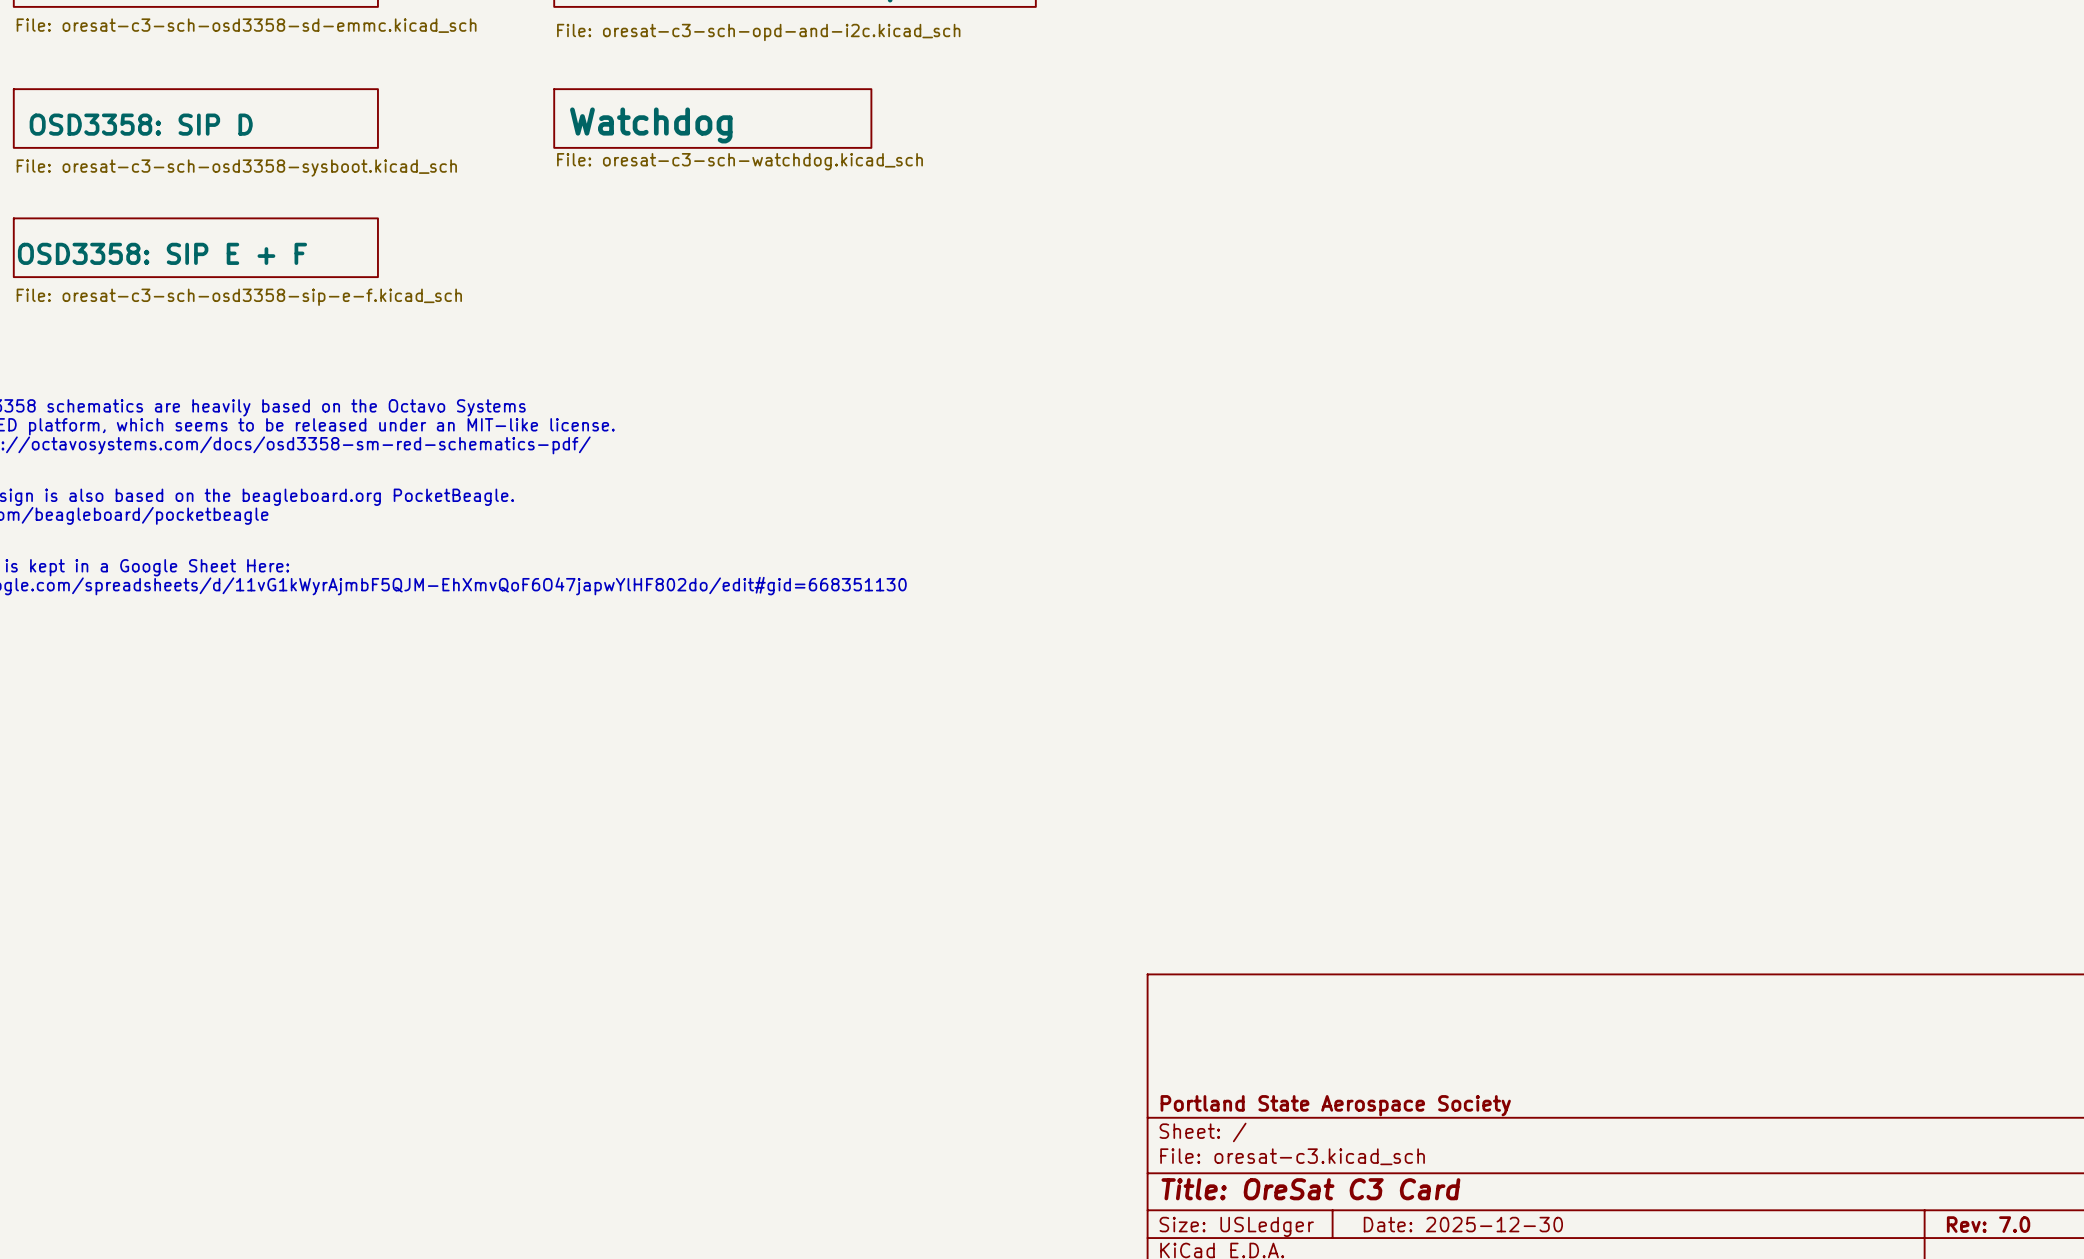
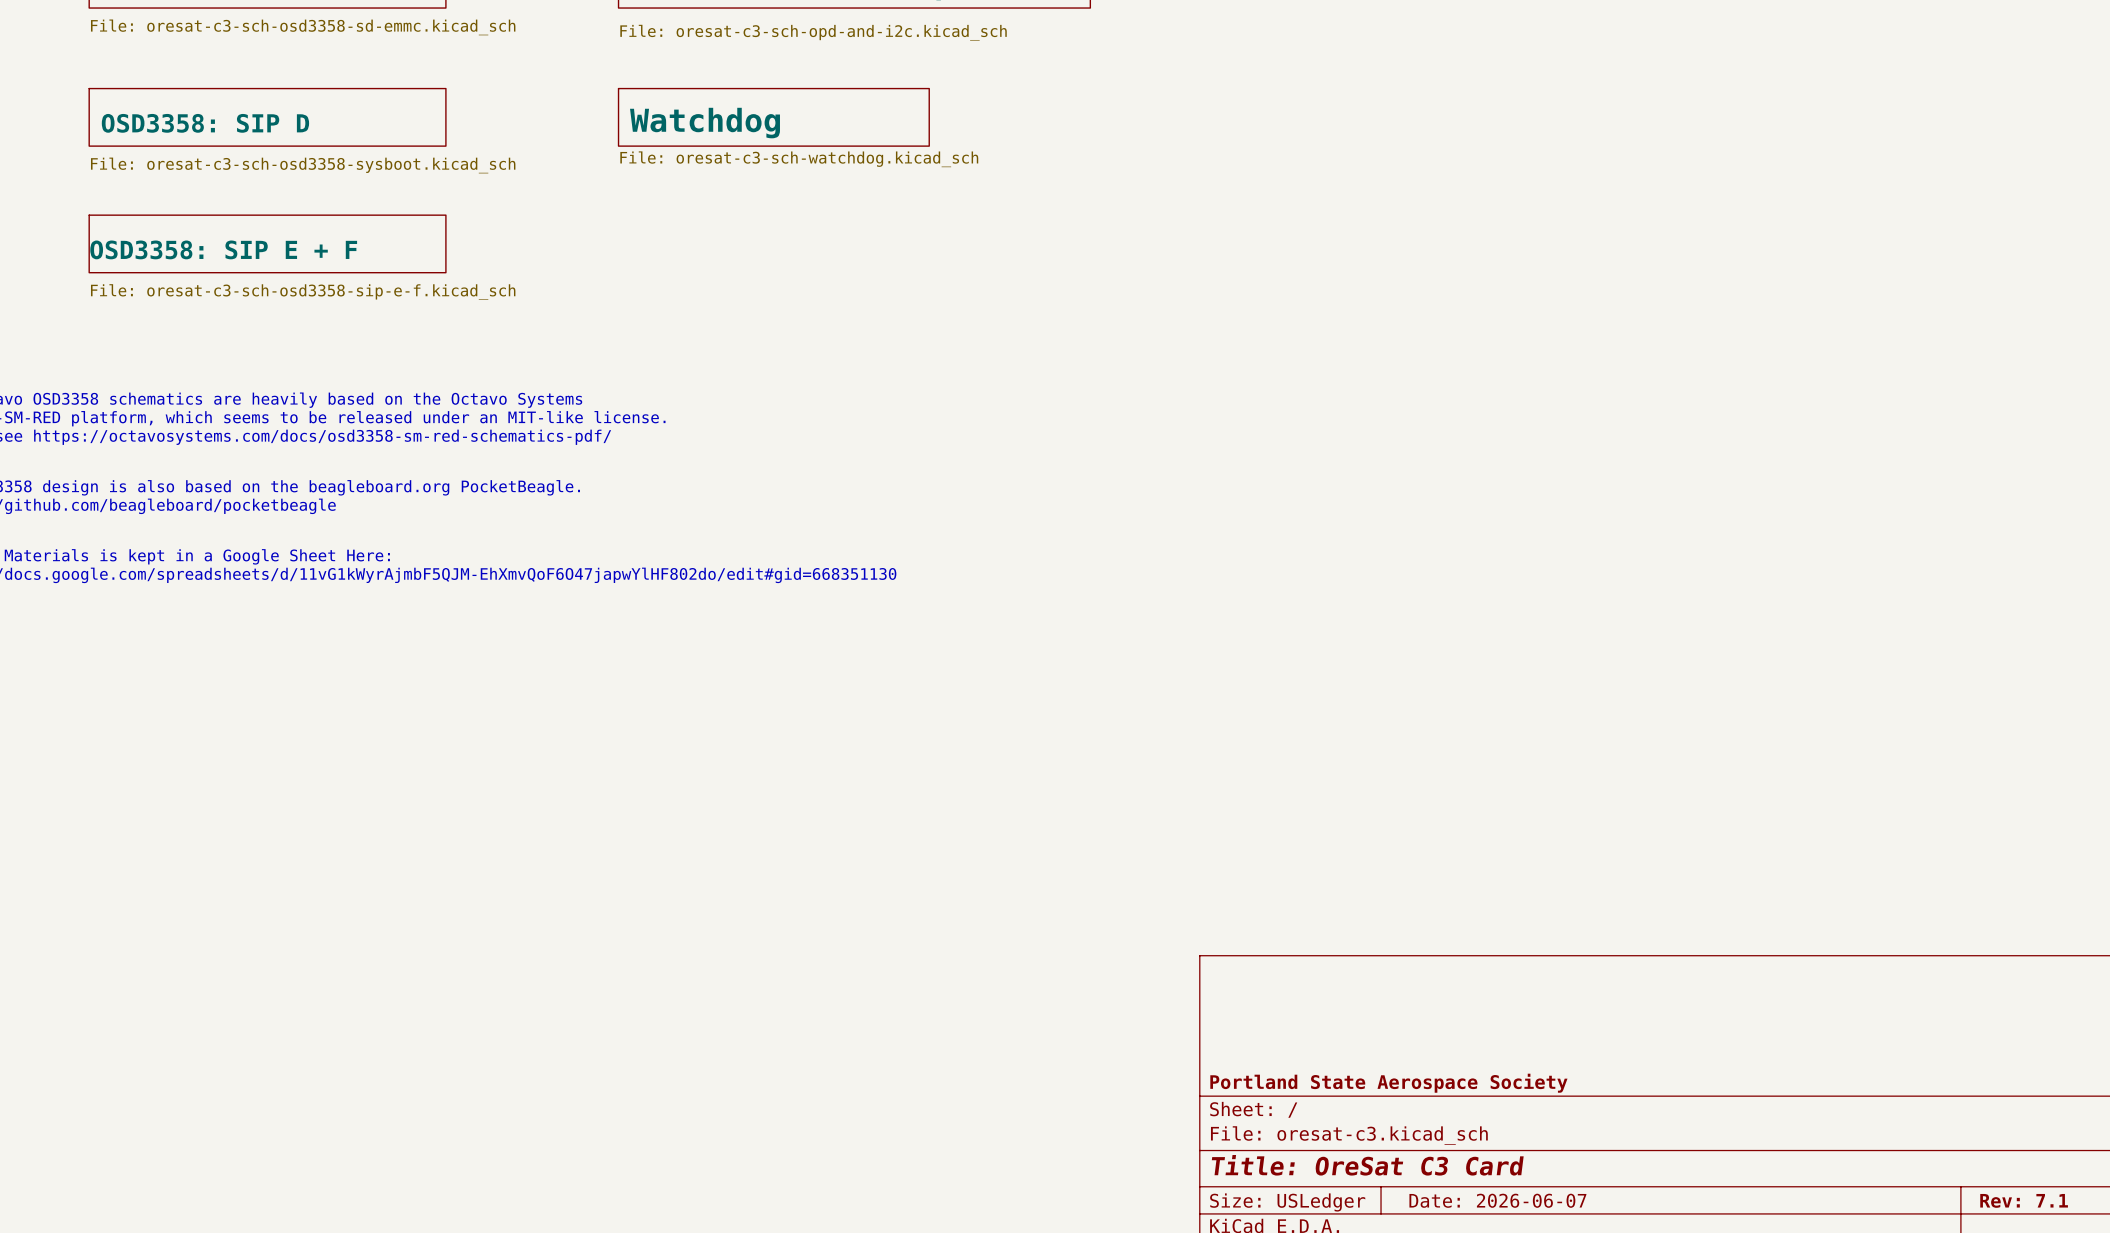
title block: Date: 2025-12-30 (1463, 1224) -> Date: 2026-06-07 (1497, 1200)
title block: Rev: 7.0 (1988, 1224) -> Rev: 7.1 (2024, 1200)

